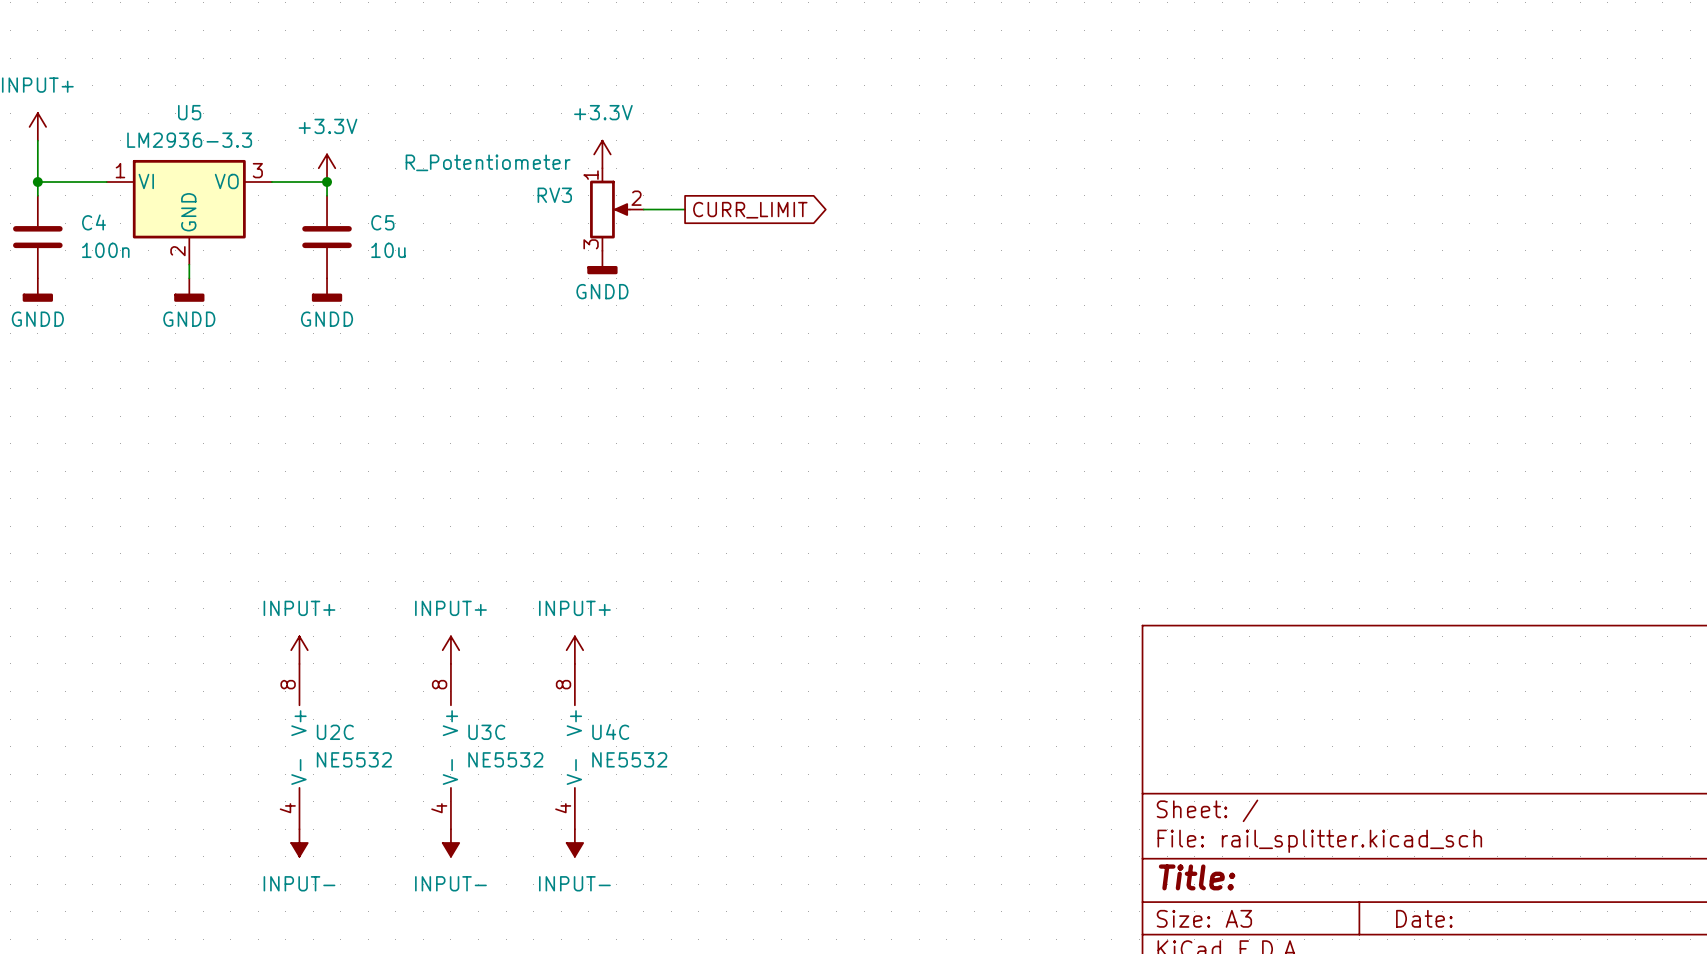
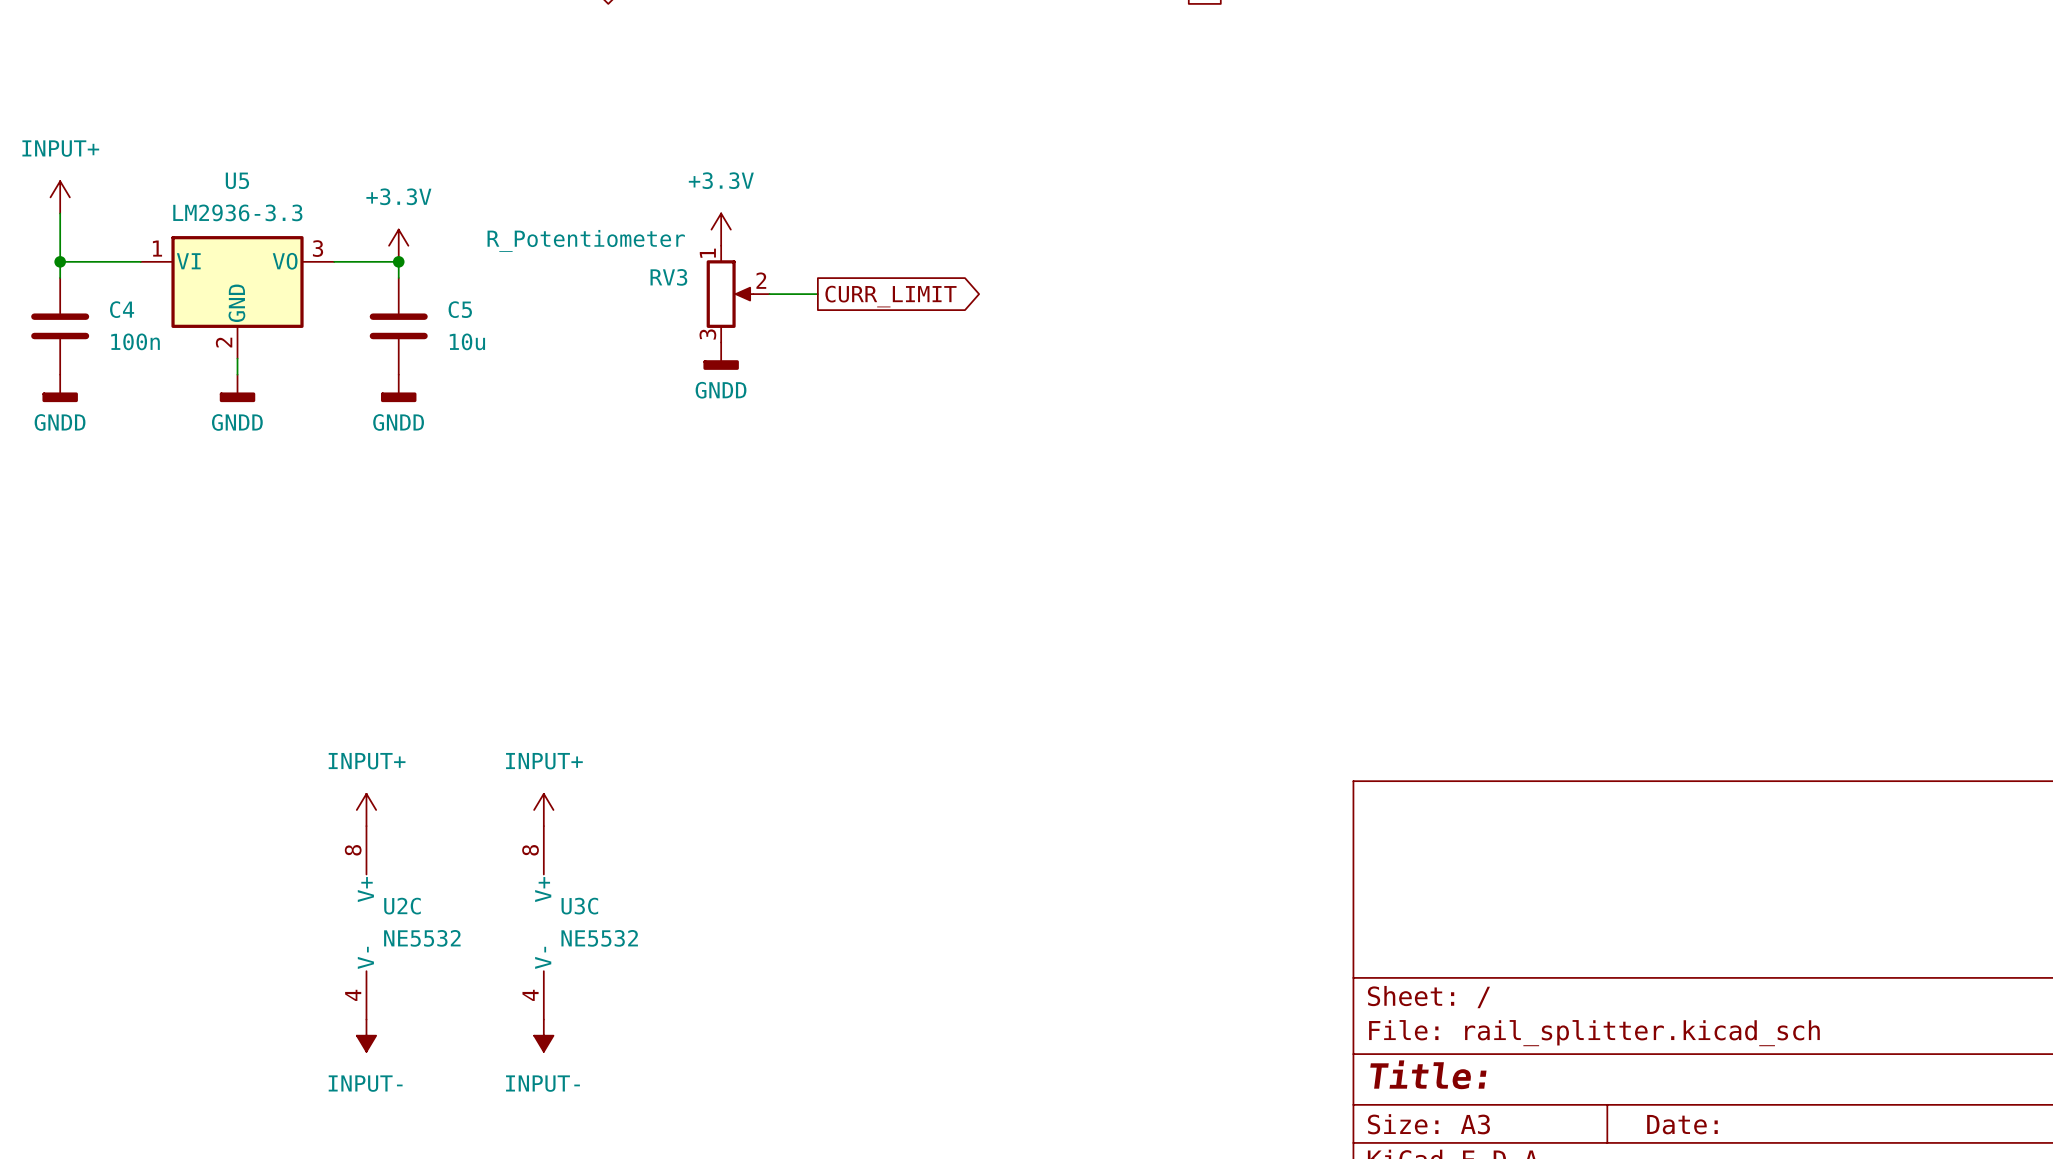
power symbol: INPUT+ (574, 650) -> none
U4C: NE5532 (574, 746) -> none
power symbol: INPUT- (574, 842) -> none

